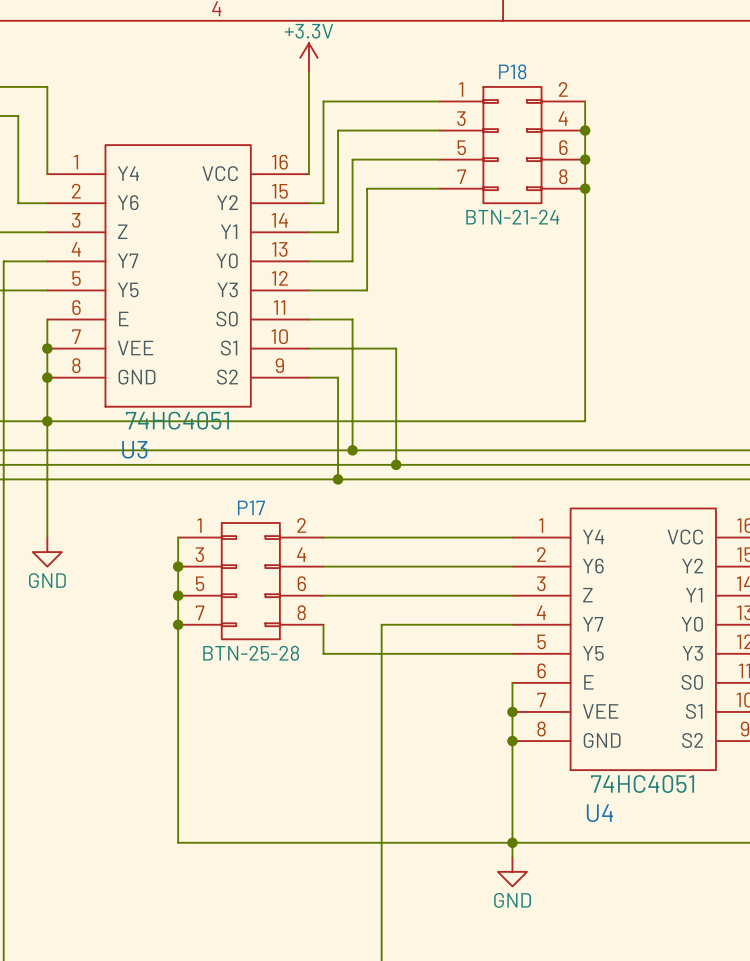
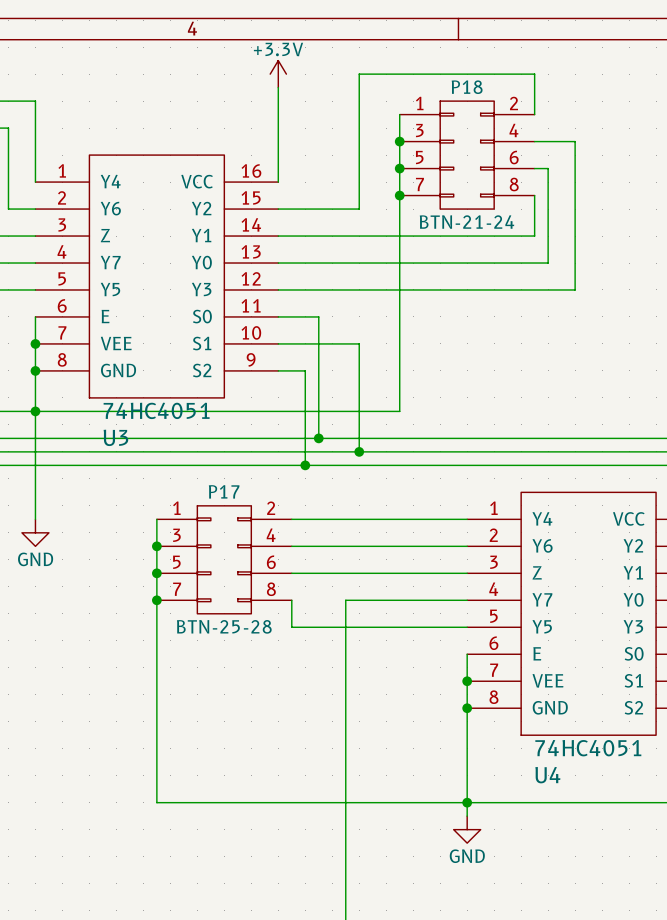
wire: (439, 101) (323, 101) (323, 203) -> (534, 114) (534, 74) (359, 74) (359, 209) (291, 209)
wire: (585, 101) (585, 188) -> none
wire: (439, 130) (338, 130) (338, 232) -> (534, 236) (305, 236)
junction: none -> (399, 141)
junction: (585, 130) -> none
wire: (439, 159) (352, 159) (352, 261) -> (534, 168) (548, 168) (548, 263) (318, 263)
junction: none -> (399, 168)
junction: (585, 159) -> none
wire: (439, 188) (367, 188) (367, 290) -> (534, 141) (575, 141) (575, 289) (332, 289)
junction: none -> (399, 195)
junction: (585, 188) -> none
wire: (585, 232) (585, 421) (439, 421) -> (399, 114) (399, 411)

